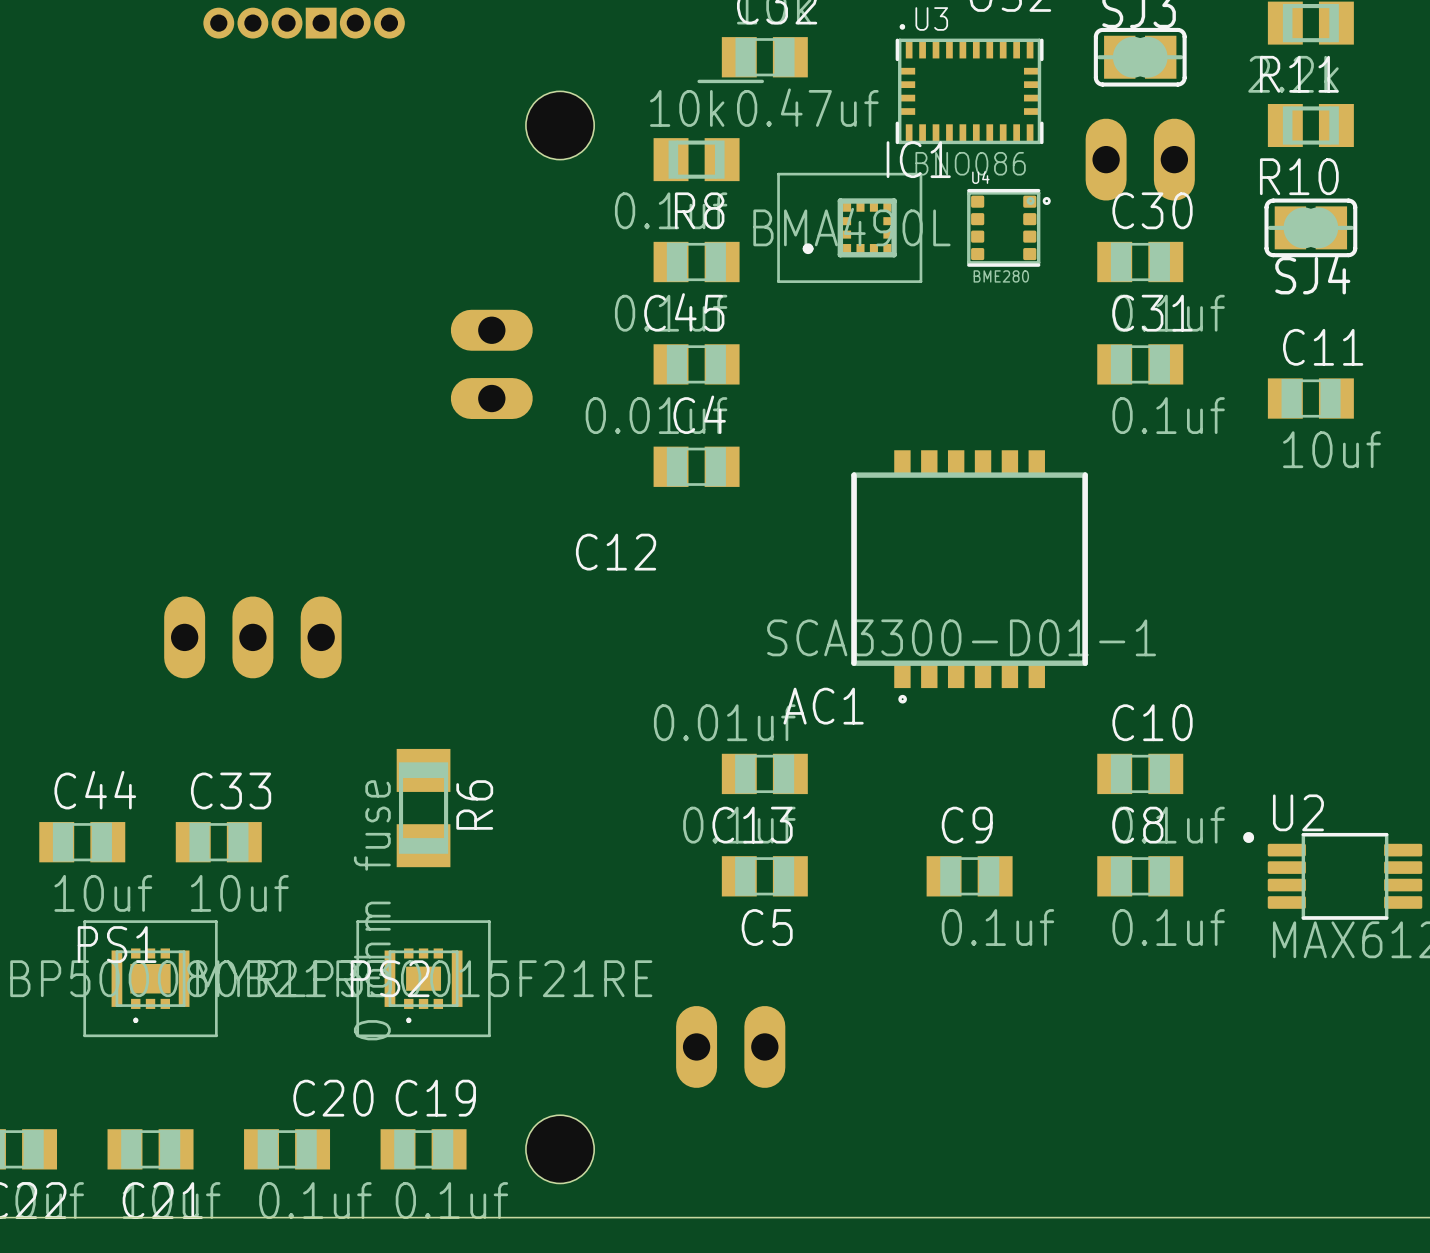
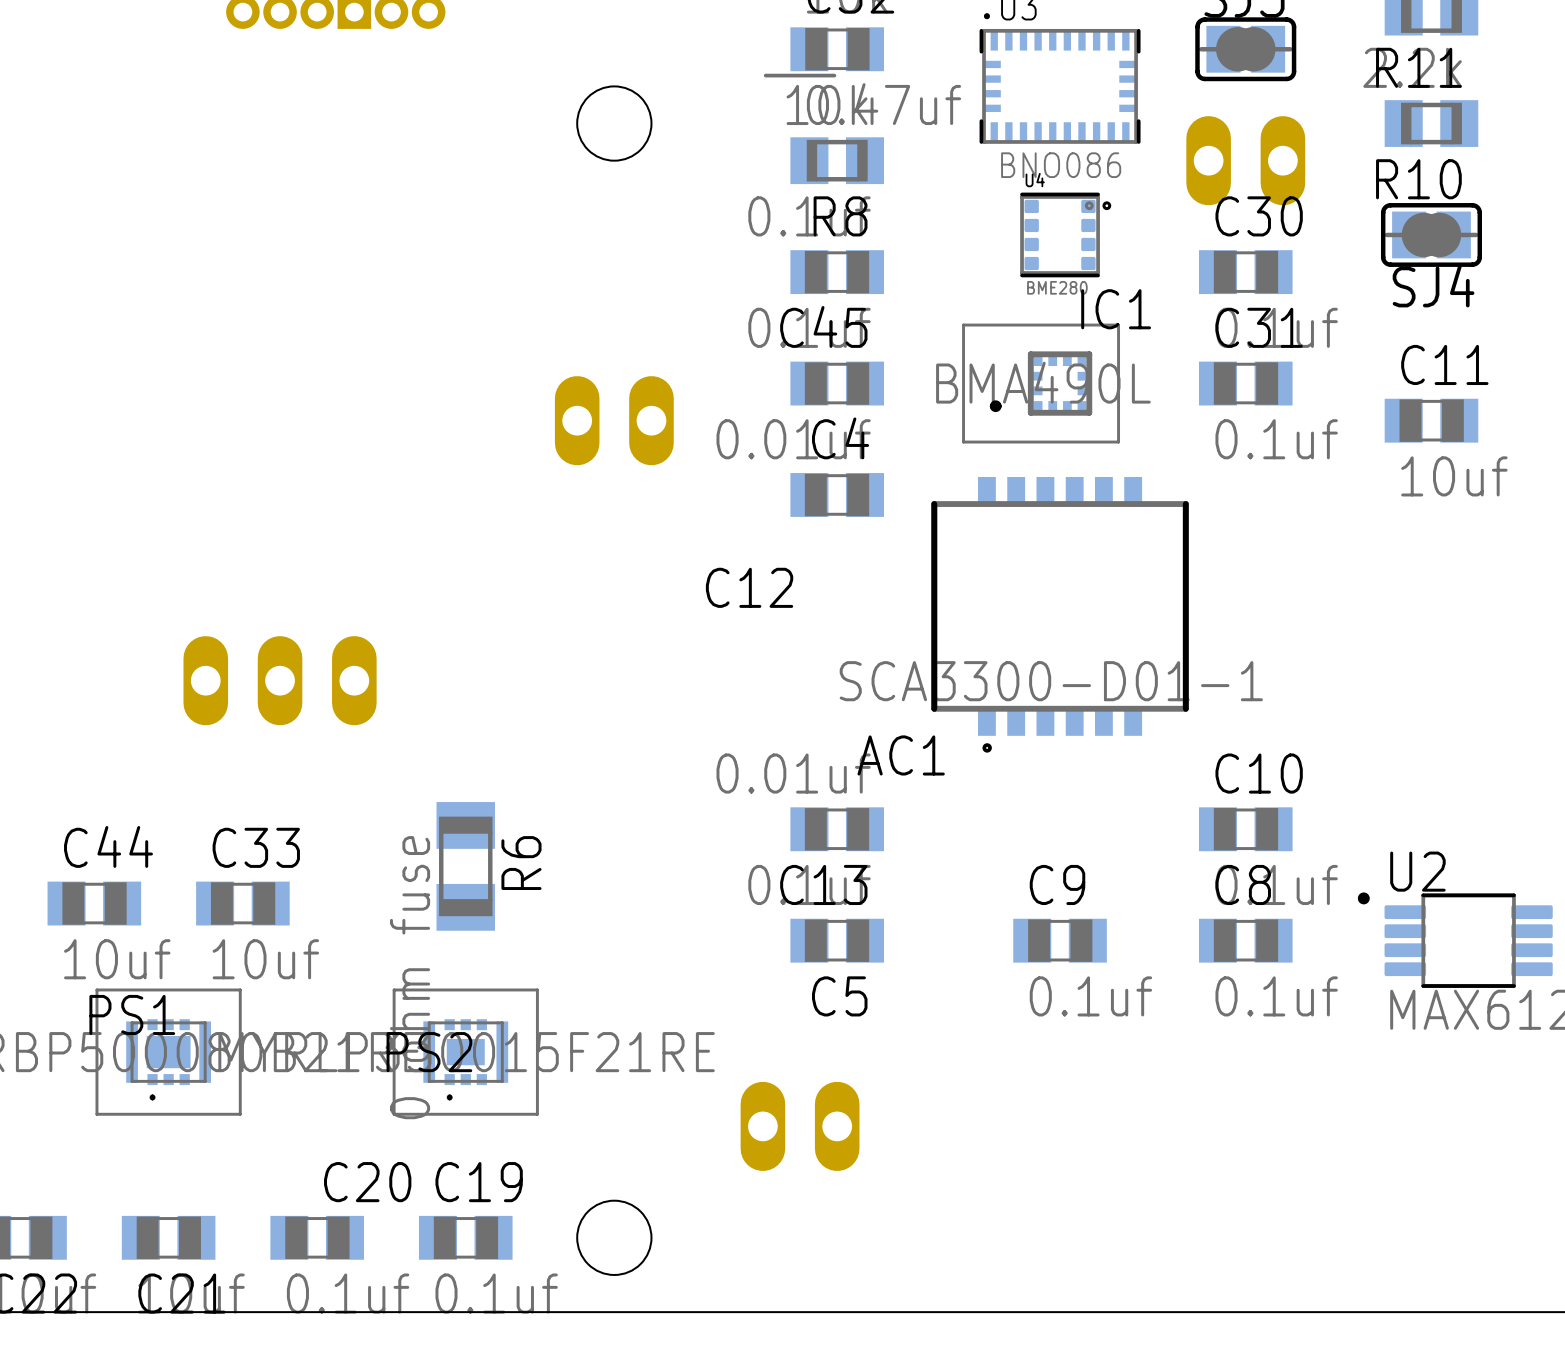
R8 position: (696, 159) -> (837, 160)
IC1 position: (849, 227) -> (1041, 383)
U4 position: (1008, 227) -> (1065, 234)
C45 position: (696, 262) -> (837, 272)
part rotation: 0° (491, 364) -> 90° clockwise (614, 420)
part position: (491, 364) -> (614, 420)
C4 position: (696, 364) -> (837, 383)
C12 position: (696, 466) -> (837, 494)

